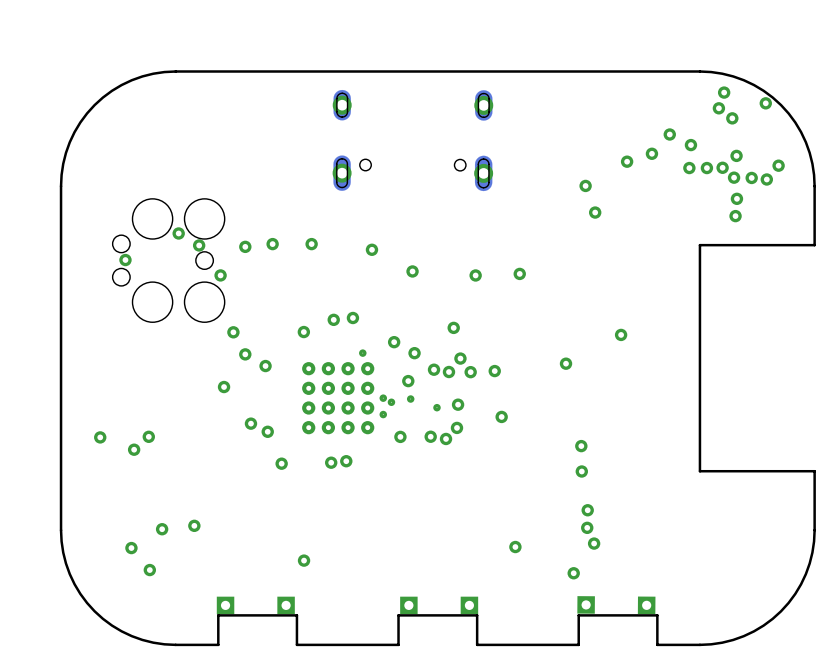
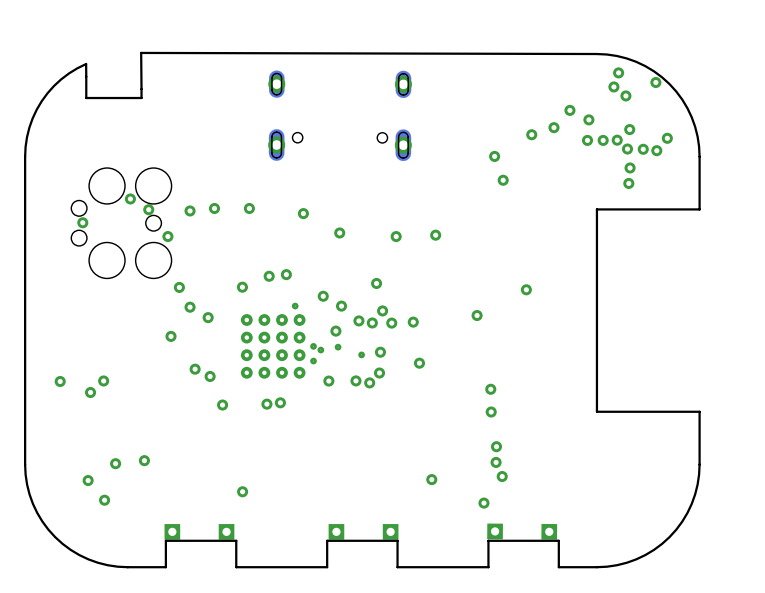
board edge: (699, 71) (175, 71) (153, 73) (131, 80) (112, 90) (87, 113) (69, 142) (63, 163) (61, 186) -> (596, 54) (141, 52) (141, 98) (86, 98) (86, 64) (77, 68) (54, 85) (41, 101) (29, 127) (25, 156)

